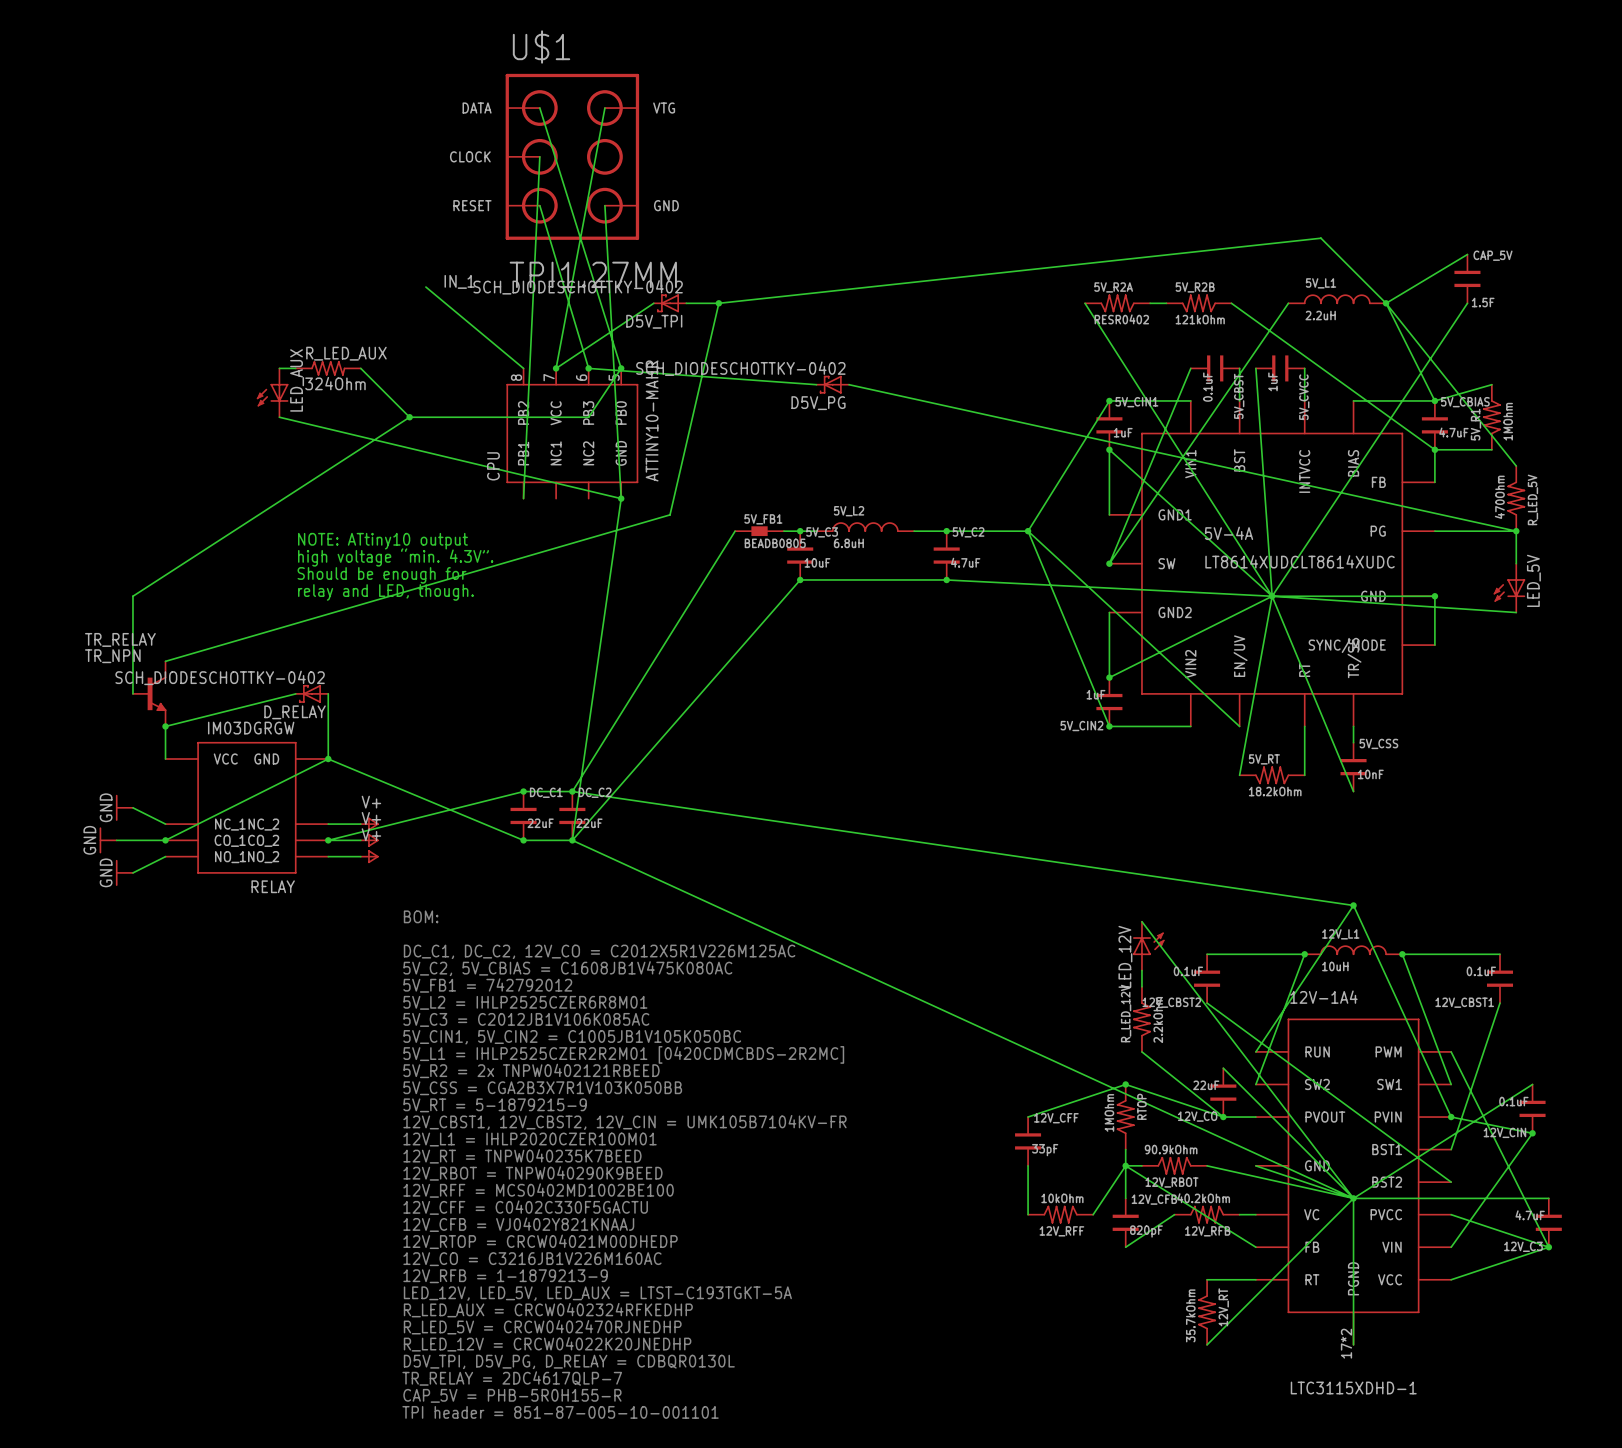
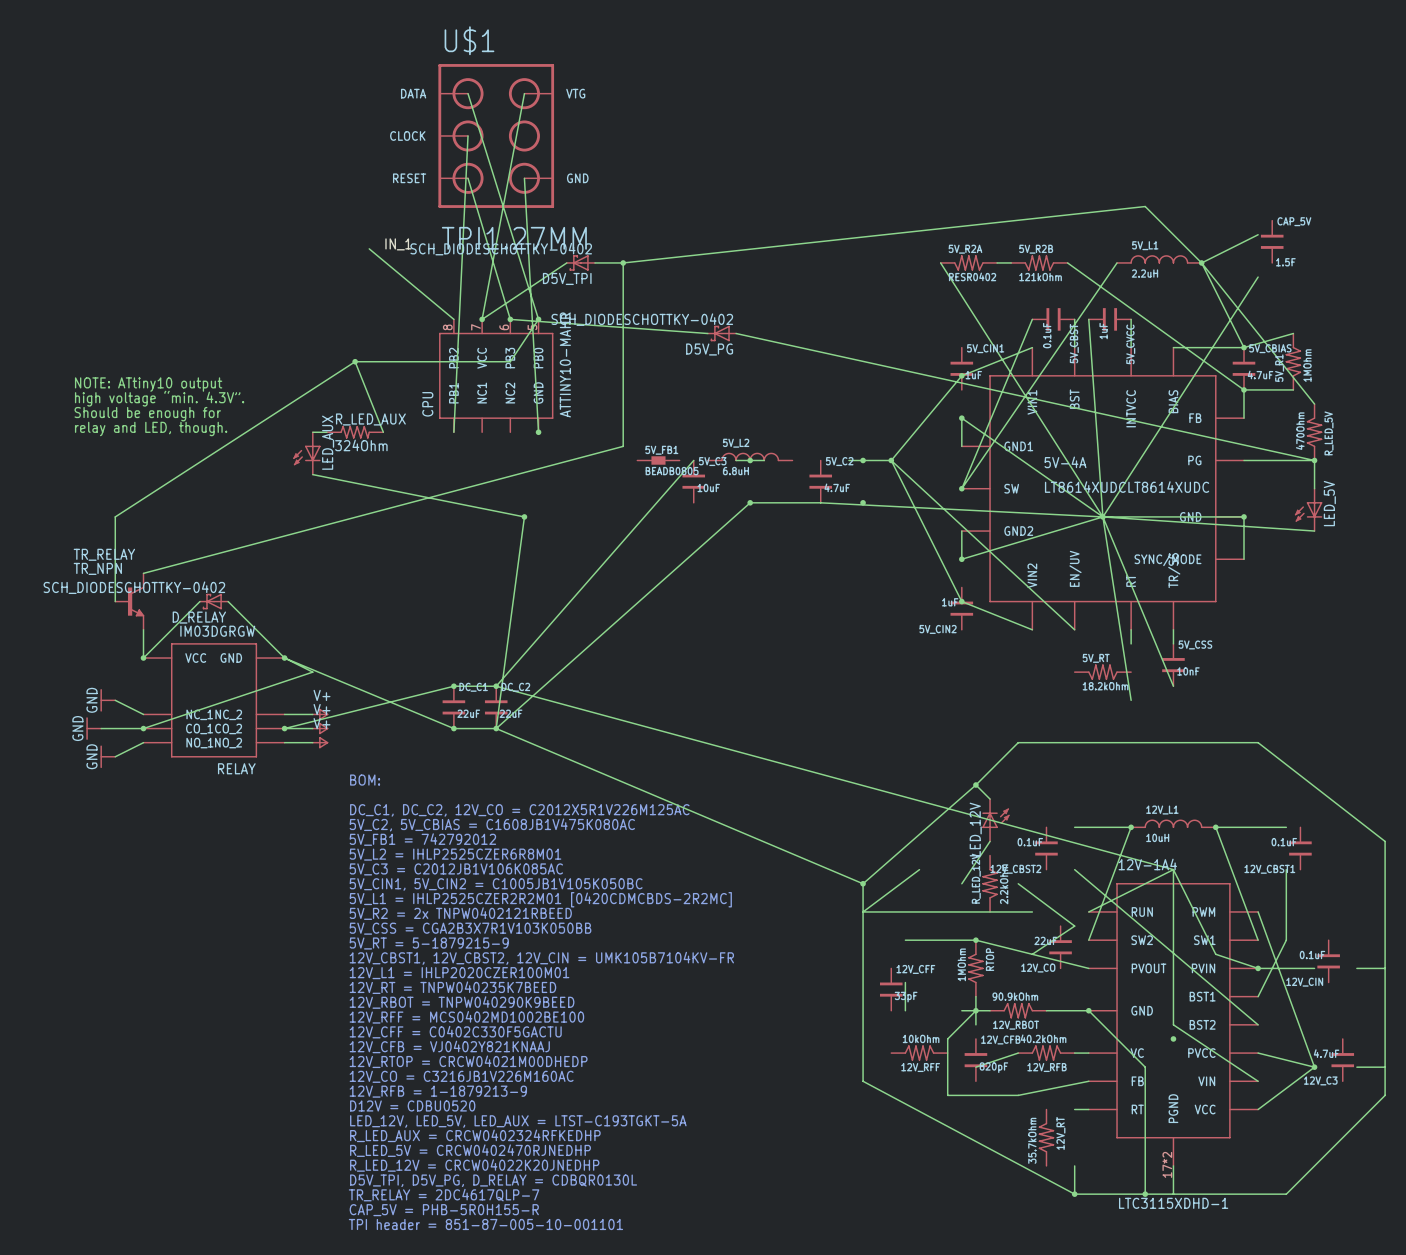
wire: (1467, 254) (1386, 303) -> (1258, 234) (1201, 262)
wire: (718, 303) (670, 514) (165, 661) -> (623, 262) (623, 446) (143, 573)
wire: (1467, 303) (1272, 596) -> (1258, 277) (1102, 516)
wire: (279, 368) (295, 368) -> (312, 432) (326, 432)
R_LED_AUX position: (328, 368) -> (355, 432)
wire: (360, 368) (409, 417) -> (383, 432) (355, 361)
LED_AUX position: (272, 392) -> (306, 453)
junction: (1109, 400) -> none
wire: (1190, 400) (1109, 400) (1028, 531) (1109, 726) (1190, 726) -> (1032, 347) (961, 375) (891, 460) (961, 601) (1032, 629)
wire: (279, 417) (621, 498) (572, 840) -> (312, 474) (524, 516) (496, 728)
junction: none -> (961, 375)
text: none -> NOTE: ATtiny10 output (148, 384)
junction: (1109, 449) -> none
text: none -> high voltage “min. 4.3V”. (159, 398)
text: none -> Should be enough for (147, 414)
wire: (1109, 482) (1109, 449) (1272, 596) -> (961, 418) (1102, 516)
junction: none -> (961, 418)
text: none -> relay and LED, though. (151, 428)
wire: (735, 531) (572, 791) (1353, 905) -> none
wire: (783, 531) (816, 531) -> (736, 460) (764, 460)
wire: none -> (693, 460) (496, 686) (1173, 869)
junction: (800, 531) -> none
junction: none -> (750, 460)
wire: (914, 531) (979, 531) -> none
junction: (946, 531) -> none
junction: none -> (863, 460)
text: NOTE: ATtiny10 output (382, 541) -> none
text: high voltage “min. 4.3V”. (395, 557) -> none
text: Should be enough for (382, 575) -> none
junction: (800, 579) -> none
wire: (865, 579) (800, 579) (572, 840) -> (750, 502) (496, 728)
junction: none -> (750, 502)
junction: (946, 579) -> none
junction: none -> (863, 502)
text: relay and LED, though. (385, 592) -> none
junction: none -> (524, 516)
wire: (1272, 596) (1109, 677) (1109, 645) -> (1102, 516) (961, 559)
wire: (1272, 596) (1239, 775) -> (1102, 516) (1131, 700)
junction: none -> (961, 559)
junction: (1109, 677) -> none
wire: none -> (199, 601) (143, 658)
wire: (295, 693) (165, 726) -> none
D_RELAY position: (311, 693) -> (214, 601)
wire: (328, 693) (328, 759) (165, 840) -> (228, 601) (284, 658) (312, 672) (143, 728)
junction: none -> (961, 601)
junction position: (165, 726) -> (143, 658)
junction: (1109, 726) -> none
wire: (1304, 742) (1304, 775) -> none
wire: (572, 840) (1353, 1198) -> (496, 728) (863, 883)
wire: none -> (975, 785) (1018, 742) (1258, 742) (1385, 841) (1385, 1095) (1286, 1194) (1074, 1194)
wire: none -> (975, 785) (863, 883)
junction: none -> (975, 785)
wire: (1353, 905) (1451, 1117) (1532, 1133) (1451, 1247) -> (1173, 869) (1173, 1024) (1258, 1081)
wire: (1353, 905) (1255, 1051) -> (1173, 869) (1088, 911)
junction: (1353, 905) -> none
text position: BOM: (421, 916) -> BOM: (365, 780)
wire: (1141, 921) (1353, 1198) -> (990, 799) (975, 785)
text: none -> DC_C1, DC_C2, 12V_CO = C2012X5R1V226M125AC (519, 810)
text: DC_C1, DC_C2, 12V_CO = C2012X5R1V226M125AC (599, 951) -> 5V_C2, 5V_CBIAS = C1608JB1V475K080AC (492, 824)
wire: (1207, 954) (1239, 954) -> none
wire: (1483, 954) (1500, 954) -> none
text: 5V_C2, 5V_CBIAS = C1608JB1V475K080AC (567, 968) -> 5V_FB1 = 742792012 (422, 839)
wire: (1141, 970) (1141, 986) -> (990, 841) (961, 883)
text: 5V_FB1 = 742792012 (487, 985) -> 5V_L2 = IHLP2525CZER6R8M01 (455, 854)
text: 5V_L2 = IHLP2525CZER6R8M01 (525, 1002) -> 5V_C3 = C2012JB1V106K085AC (456, 869)
wire: none -> (919, 869) (863, 911) (1032, 911)
wire: (1207, 1003) (1451, 1182) -> (1074, 869) (1258, 1024)
wire: none -> (1173, 869) (1215, 954) (1258, 968) (1314, 968)
wire: (1500, 1003) (1451, 1149) -> (1286, 869) (1286, 940) (1258, 996)
text: 5V_C3 = C2012JB1V106K085AC (526, 1019) -> 5V_CIN1, 5V_CIN2 = C1005JB1V105K050BC (496, 884)
wire: none -> (863, 883) (863, 1081) (1074, 1194)
junction: none -> (863, 883)
wire: none -> (1018, 883) (1074, 926) (1032, 954)
text: 5V_CIN1, 5V_CIN2 = C1005JB1V105K050BC (572, 1037) -> 5V_L1 = IHLP2525CZER2R2M01 [0420CDMCBDS-2R2MC] (540, 899)
wire: (1141, 1051) (1223, 1117) -> none
wire: (1451, 1051) (1548, 1247) -> (1258, 911) (1314, 1067)
text: 5V_L1 = IHLP2525CZER2R2M01 [0420CDMCBDS-2R2MC] (623, 1054) -> 5V_R2 = 2x TNPW0402121RBEED (460, 913)
wire: (1223, 1068) (1353, 1198) -> none
text: 5V_R2 = 2x TNPW0402121RBEED (531, 1070) -> 5V_CSS = CGA2B3X7R1V103K050BB (470, 928)
wire: (1532, 1084) (1353, 1198) -> none
text: 5V_CSS = CGA2B3X7R1V103K050BB (542, 1088) -> 5V_RT = 5-1879215-9 (429, 943)
text: 5V_RT = 5-1879215-9 (495, 1105) -> 12V_CBST1, 12V_CBST2, 12V_CIN = UMK105B7104KV-FR (541, 958)
wire: (1028, 1117) (1125, 1084) (1223, 1117) -> none
wire: (1223, 1117) (1255, 1117) -> (905, 940) (975, 940) (1088, 968)
junction: (1223, 1117) -> none
wire: none -> (1356, 968) (1385, 968)
text: 12V_CBST1, 12V_CBST2, 12V_CIN = UMK105B7104KV-FR (624, 1122) -> 12V_L1 = IHLP2020CZER100M01 (459, 973)
wire: none -> (905, 982) (905, 1010)
junction: (1532, 1133) -> none
text: 12V_L1 = IHLP2020CZER100M01 (530, 1139) -> 12V_RT = TNPW040235K7BEED (452, 987)
text: 12V_RT = TNPW040235K7BEED (522, 1156) -> 12V_RBOT = TNPW040290K9BEED (462, 1002)
wire: (1028, 1165) (1028, 1214) -> none
wire: (1207, 1165) (1353, 1198) -> (1046, 1010) (1088, 1010) (1145, 1067) (1145, 1194)
wire: (1255, 1165) (1353, 1198) -> none
junction: none -> (1088, 1010)
text: 12V_RBOT = TNPW040290K9BEED (532, 1173) -> 12V_RFF = MCS0402MD1002BE100 (466, 1017)
wire: (1125, 1182) (1125, 1198) -> none
text: 12V_RFF = MCS0402MD1002BE100 (538, 1190) -> 12V_CFF = C0402C330F5GACTU (455, 1032)
wire: (1353, 1198) (1353, 1344) -> (1173, 1194) (1173, 1165)
wire: (1353, 1198) (1207, 1344) -> none
wire: (1353, 1198) (1548, 1198) -> none
text: 12V_CFF = C0402C330F5GACTU (525, 1207) -> 12V_CFB = VJ0402Y821KNAAJ (449, 1046)
wire: (1093, 1214) (1125, 1165) (1255, 1247) -> (961, 1010) (975, 1010) (947, 1038) (947, 1095) (1018, 1095) (1088, 1081)
wire: (1174, 1214) (1125, 1247) -> (1018, 1053) (975, 1067)
wire: (1451, 1214) (1548, 1247) -> (1258, 1053) (1314, 1067)
text: 12V_CFB = VJ0402Y821KNAAJ (518, 1224) -> 12V_RTOP = CRCW04021M00DHEDP (468, 1061)
wire: none -> (1356, 1067) (1385, 1067)
text: 12V_RTOP = CRCW04021M00DHEDP (540, 1241) -> 12V_CO = C3216JB1V226M160AC (461, 1076)
wire: (1548, 1247) (1451, 1279) -> (1314, 1067) (1258, 1109)
junction position: (1548, 1247) -> (1314, 1067)
text: 12V_CO = C3216JB1V226M160AC (532, 1259) -> 12V_RFB = 1-1879213-9 (438, 1091)
text: 12V_RFB = 1-1879213-9 (505, 1276) -> D12V = CDBU0520 (412, 1105)
wire: (1207, 1279) (1239, 1279) -> none
wire: none -> (1074, 1165) (1074, 1194)
junction: none -> (1074, 1194)
junction: none -> (1145, 1194)

